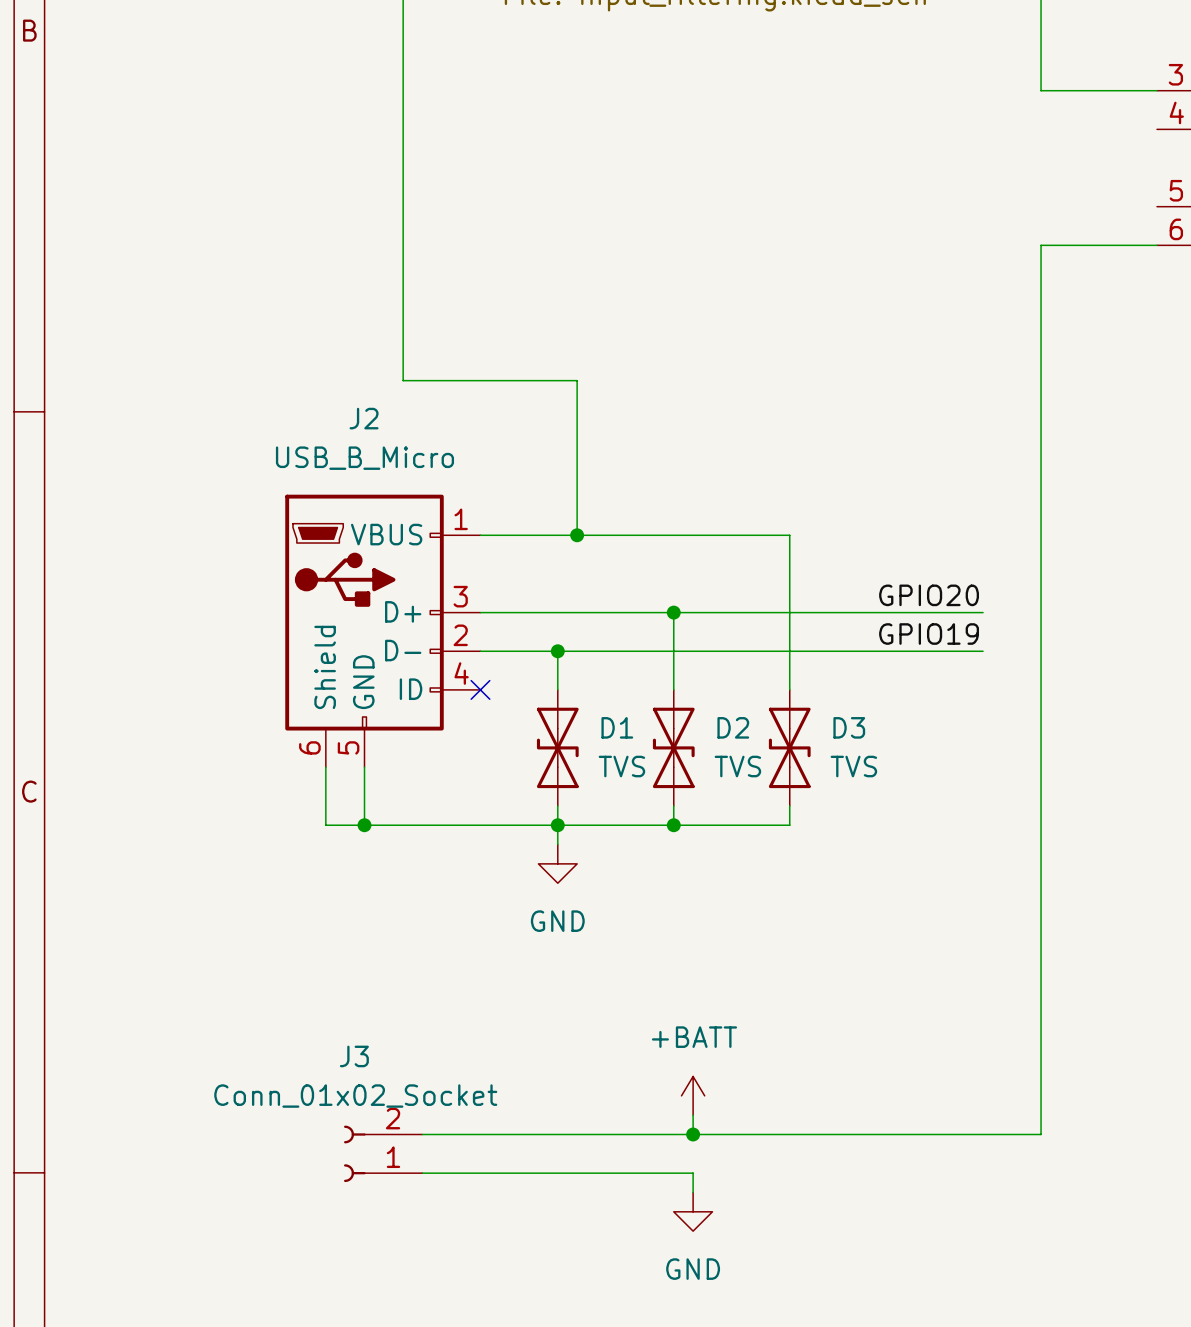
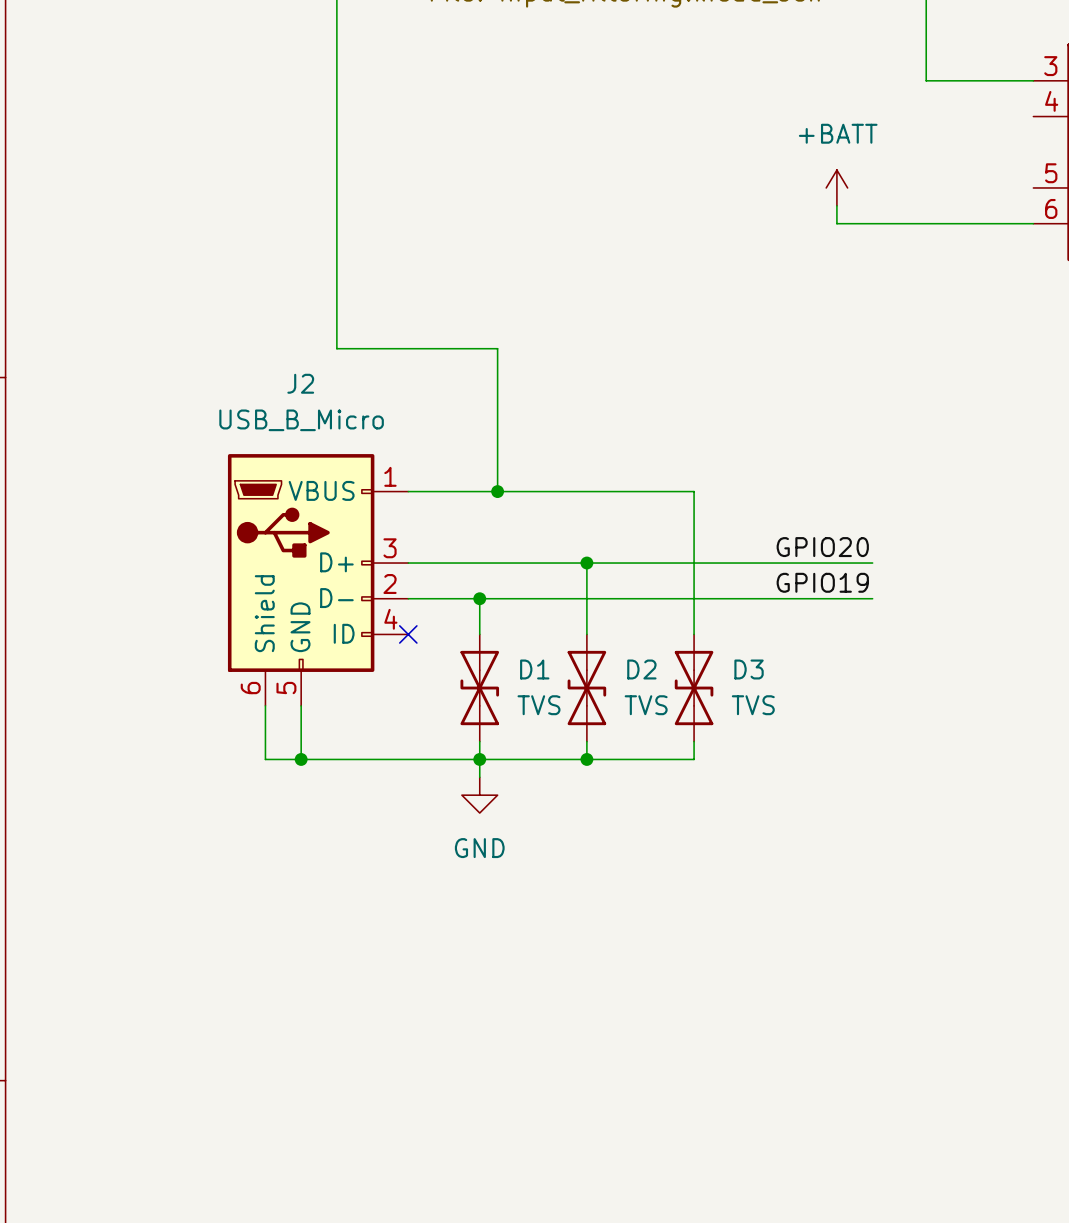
power symbol: none -> +BATT (836, 187)
wire: (1041, 245) (1041, 1134) (422, 1134) -> (926, 223) (836, 223) (836, 205)
J2 symbol: [285, 494, 481, 768] -> [227, 454, 409, 706]
power symbol: +BATT (693, 1095) -> none
wire: (693, 1115) (693, 1134) -> none
junction: (693, 1134) -> none
J3: Conn_01x02_Socket (383, 1153) -> none
wire: (422, 1173) (693, 1173) (693, 1192) -> none
power symbol: GND (693, 1211) -> none

